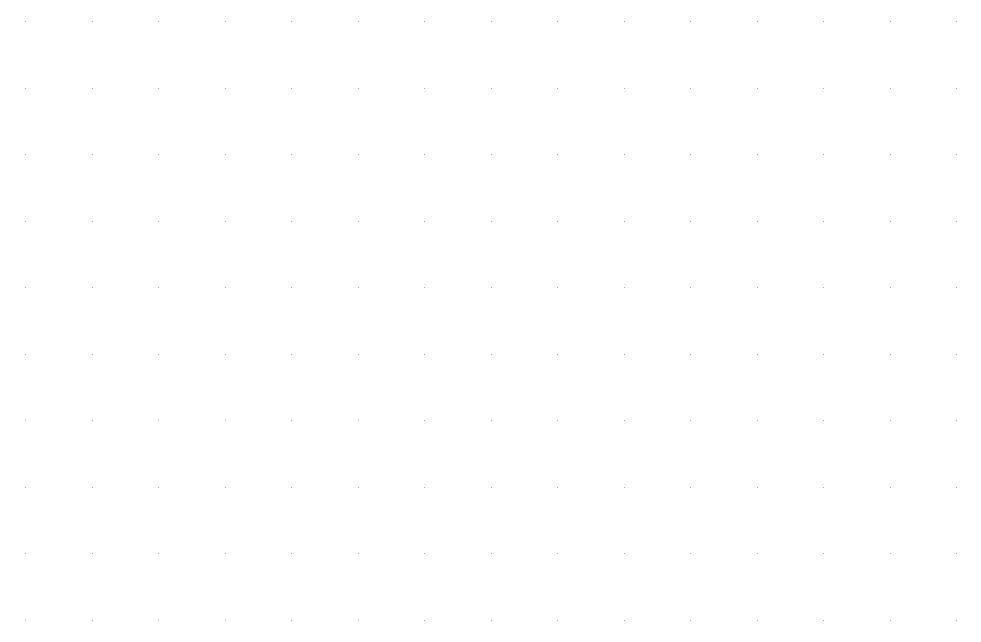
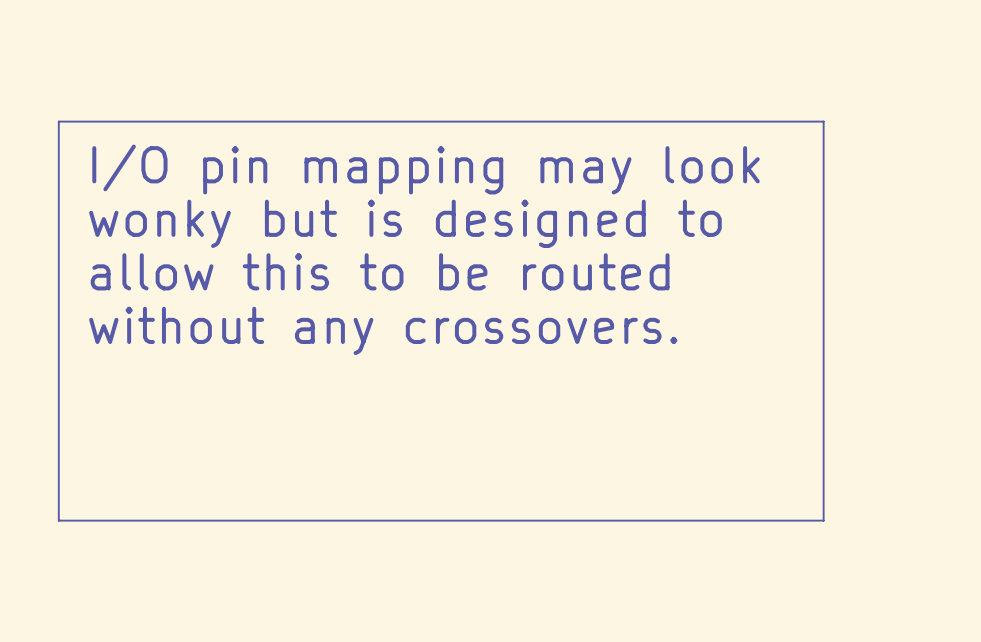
line: none -> (58, 121) (823, 121) (823, 520) (58, 520) (58, 121)
text: none -> I/O pin mapping may look (426, 169)
text: none -> wonky but is designed to (405, 223)
text: none -> allow this to be routed (380, 271)
text: none -> without any crossovers. (383, 330)

